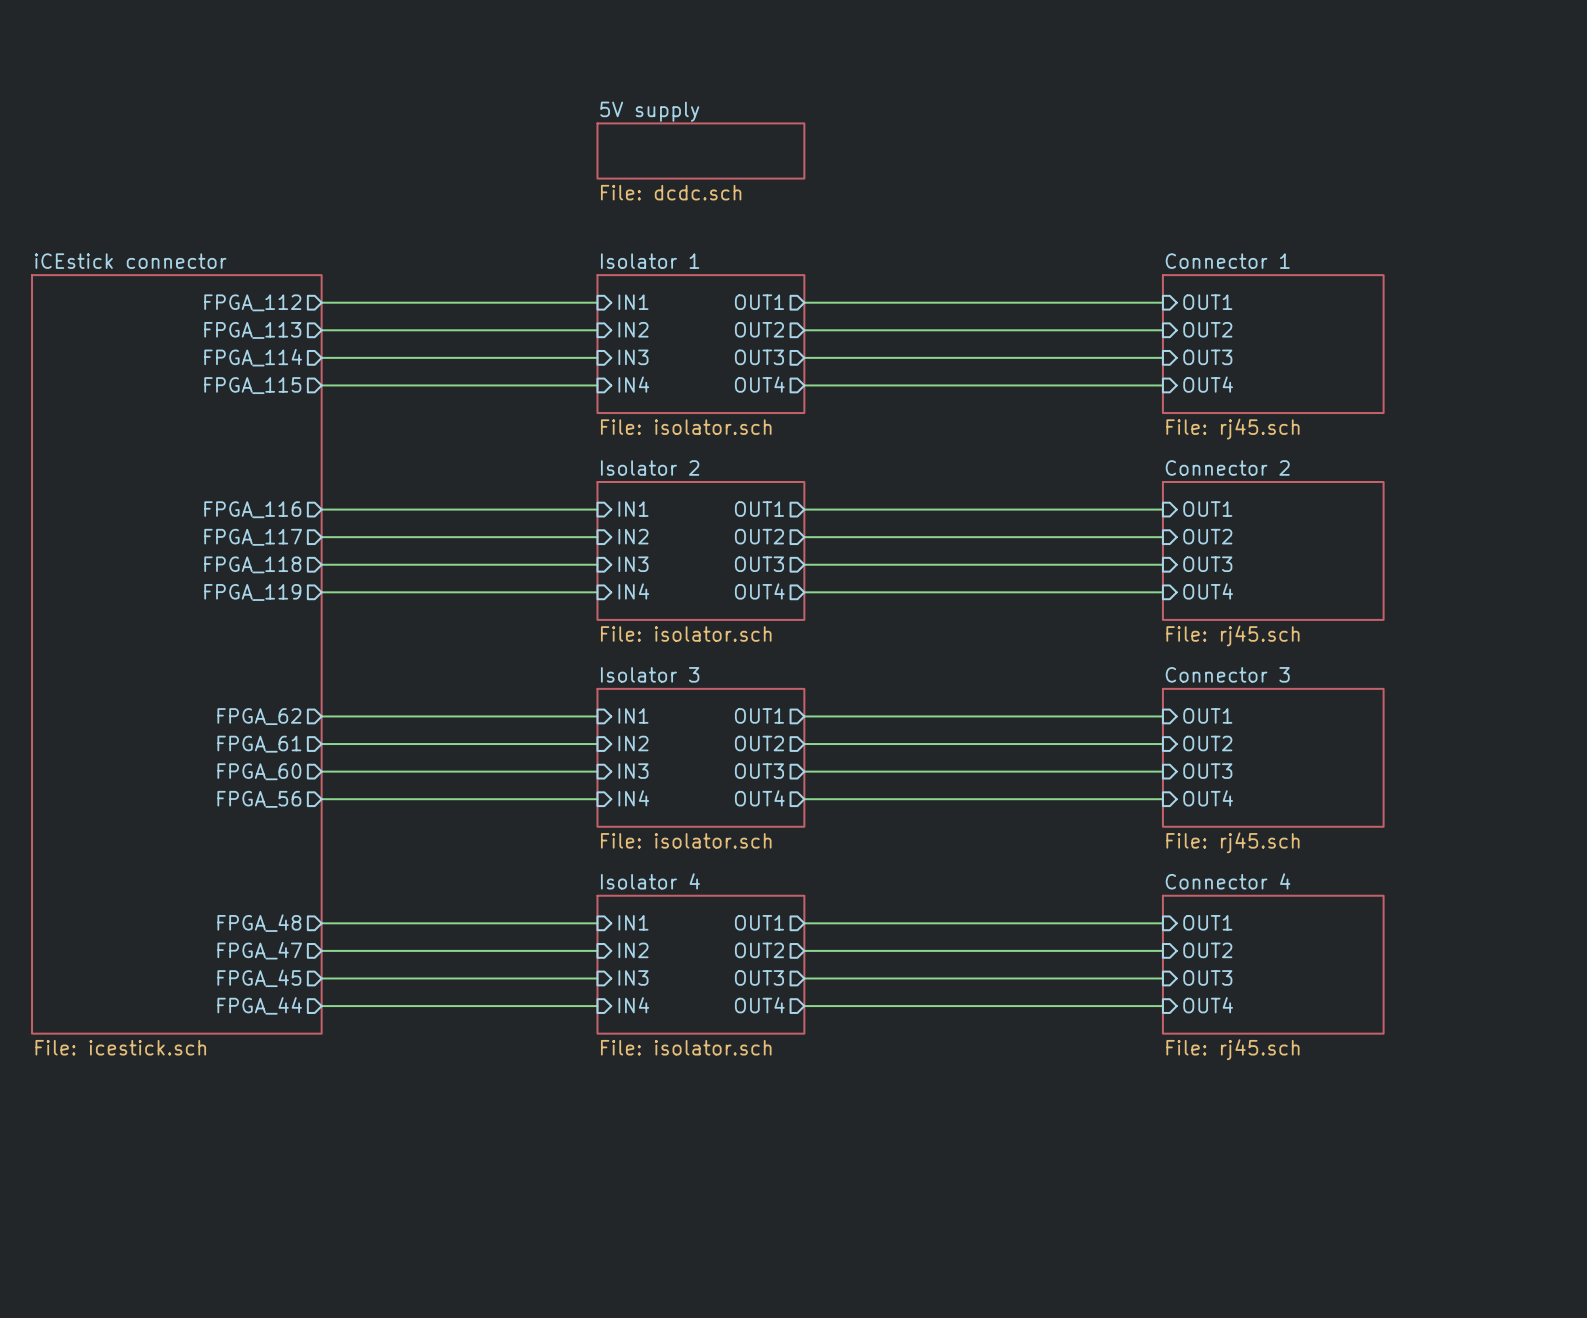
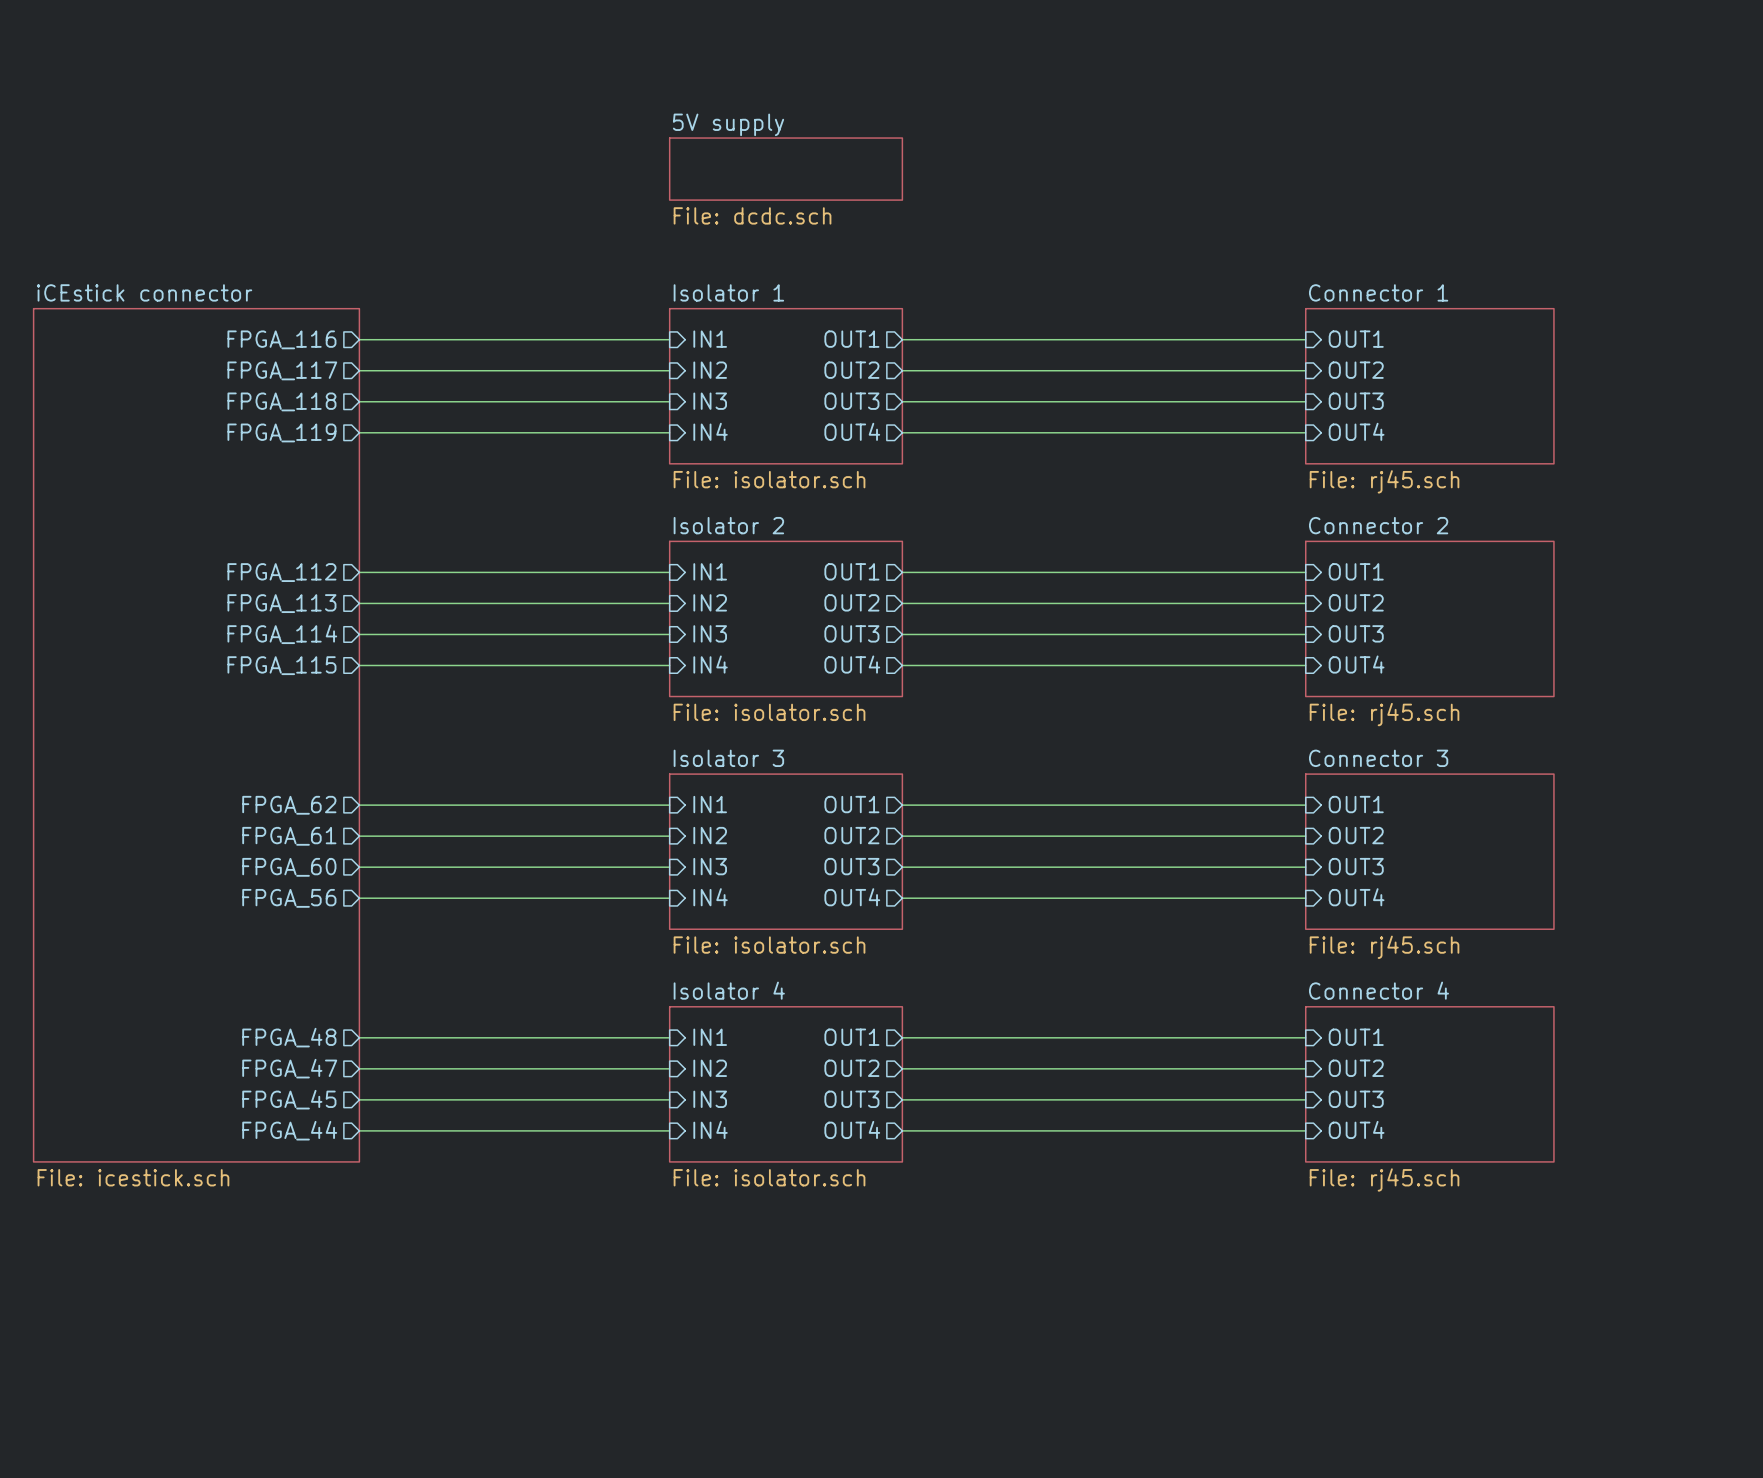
sheet pin: FPGA_112 (252, 302) -> FPGA_116 (281, 339)
sheet pin: FPGA_113 (252, 330) -> FPGA_117 (282, 370)
sheet pin: FPGA_114 (253, 357) -> FPGA_118 (281, 401)
sheet pin: FPGA_115 (252, 385) -> FPGA_119 (281, 432)
sheet pin: FPGA_116 (252, 509) -> FPGA_112 (281, 572)
sheet pin: FPGA_117 (253, 537) -> FPGA_113 (281, 603)
sheet pin: FPGA_118 (252, 564) -> FPGA_114 (282, 634)
sheet pin: FPGA_119 (252, 592) -> FPGA_115 (281, 665)

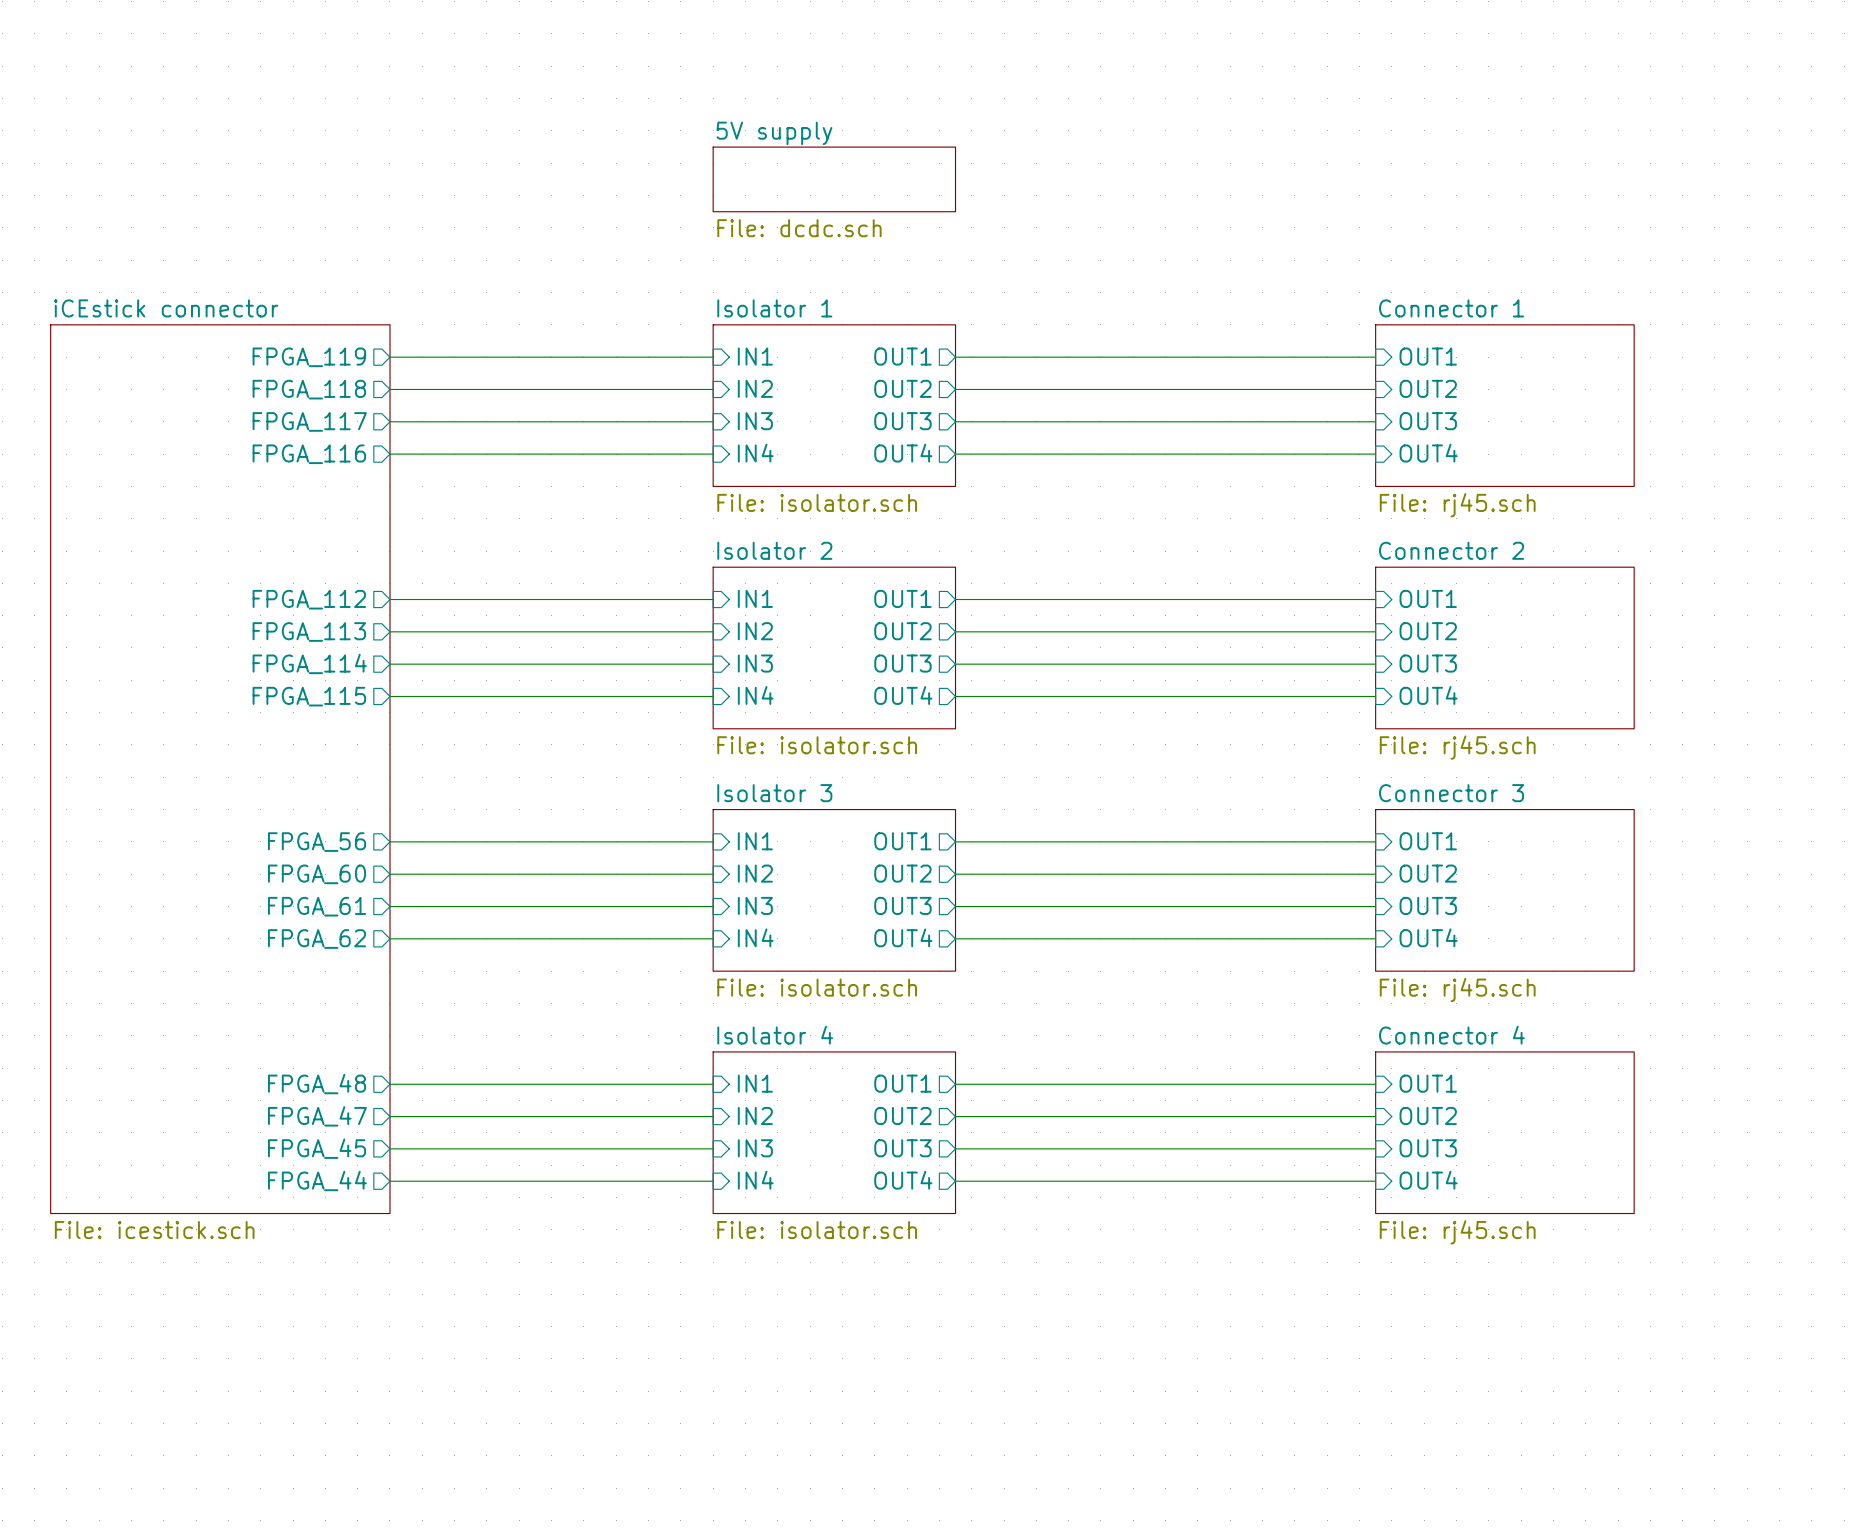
sheet pin: FPGA_116 (281, 339) -> FPGA_119 (309, 357)
sheet pin: FPGA_117 (282, 370) -> FPGA_118 (309, 389)
sheet pin: FPGA_118 (281, 401) -> FPGA_117 (309, 421)
sheet pin: FPGA_119 (281, 432) -> FPGA_116 (309, 454)
sheet pin: FPGA_62 (289, 805) -> FPGA_56 (317, 842)
sheet pin: FPGA_61 (289, 836) -> FPGA_60 (317, 874)
sheet pin: FPGA_60 (289, 867) -> FPGA_61 (317, 906)
sheet pin: FPGA_56 (289, 898) -> FPGA_62 (317, 939)

